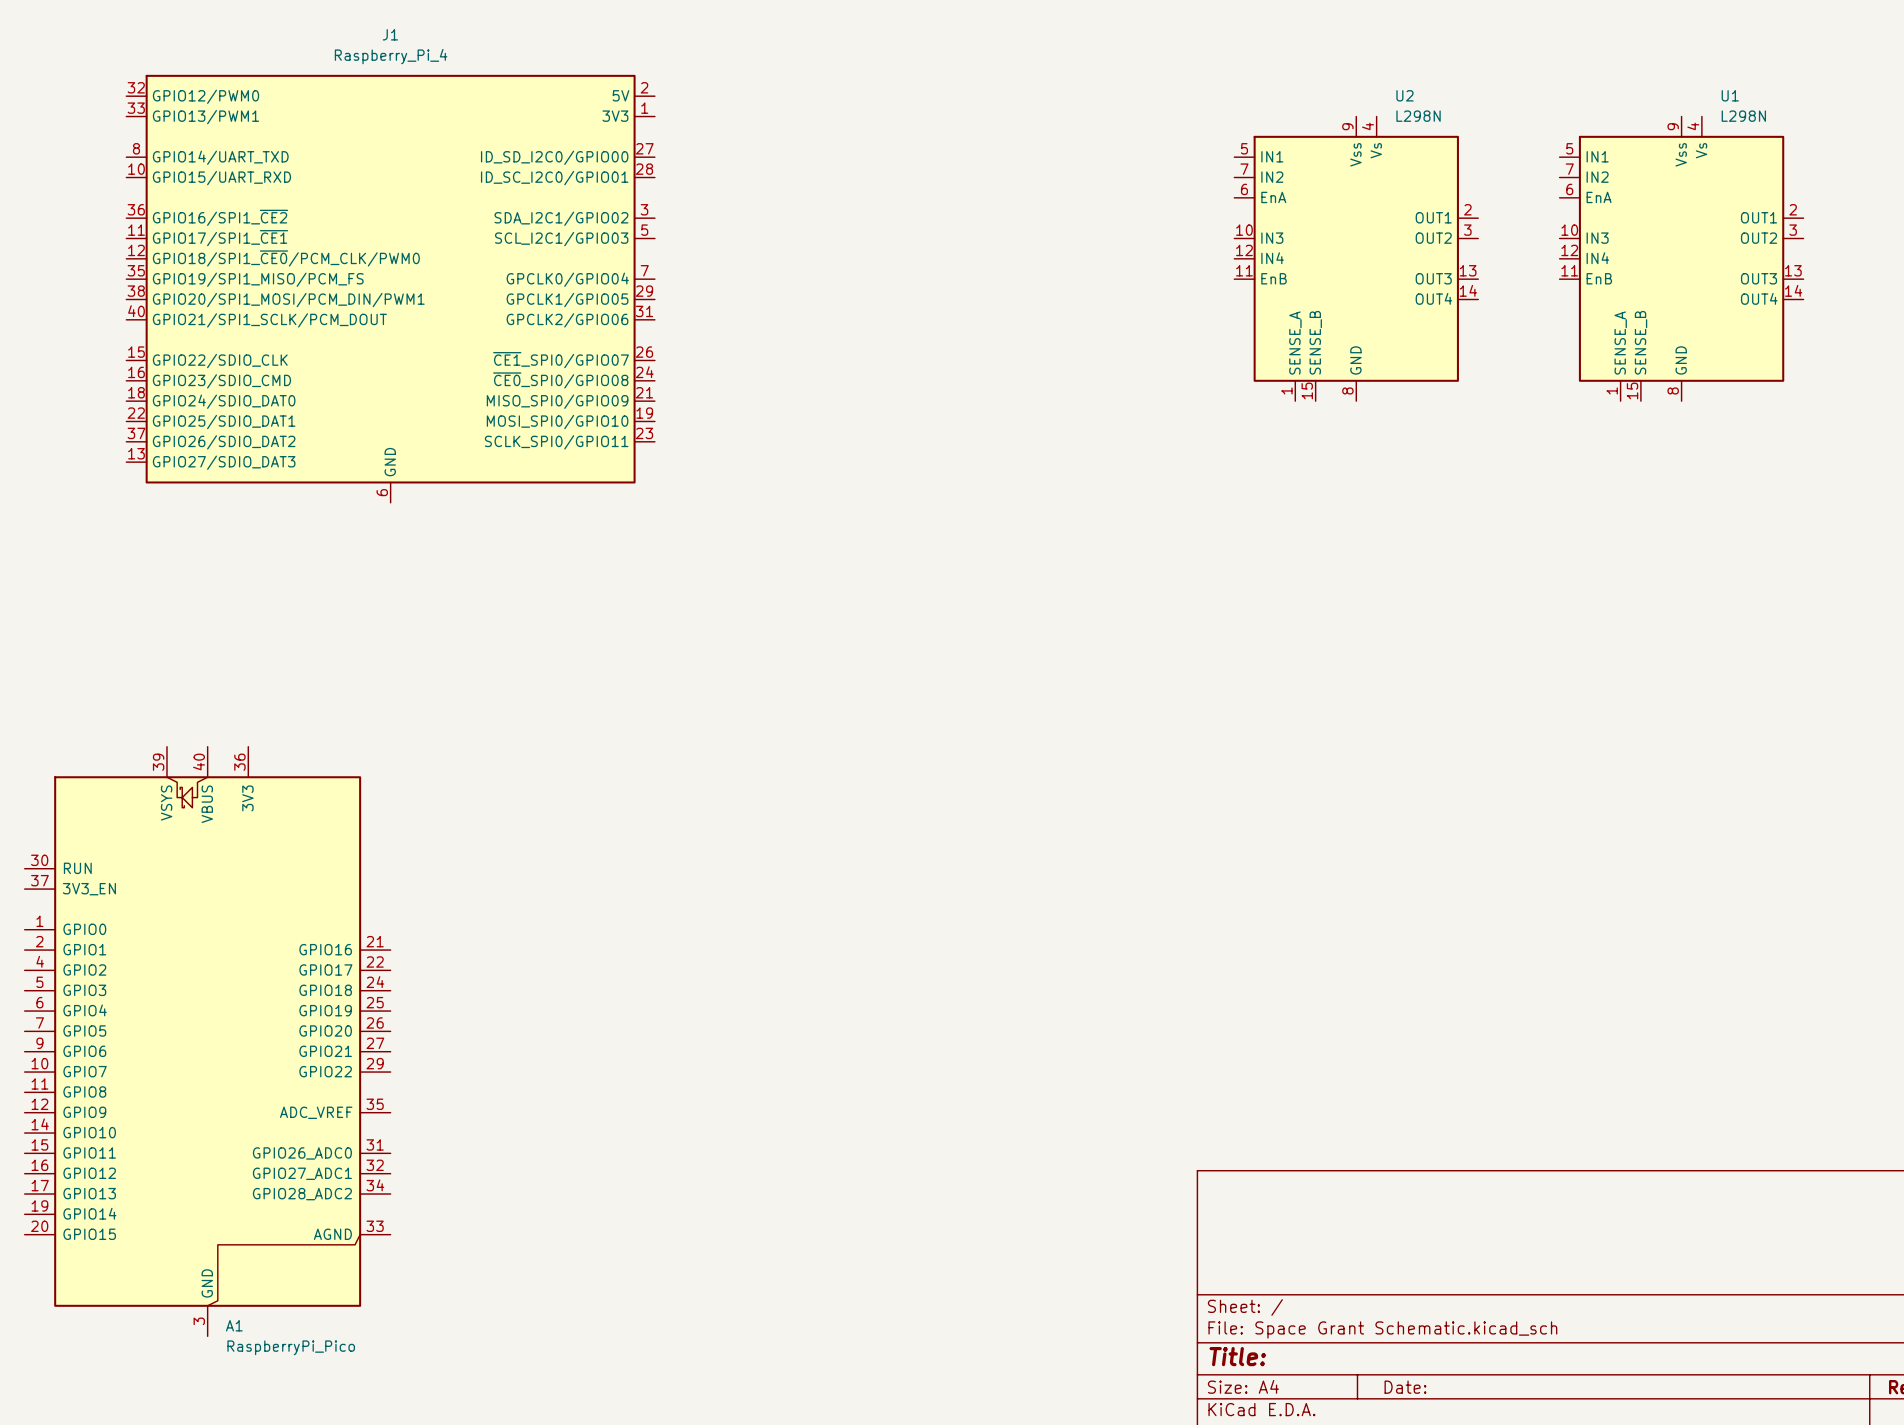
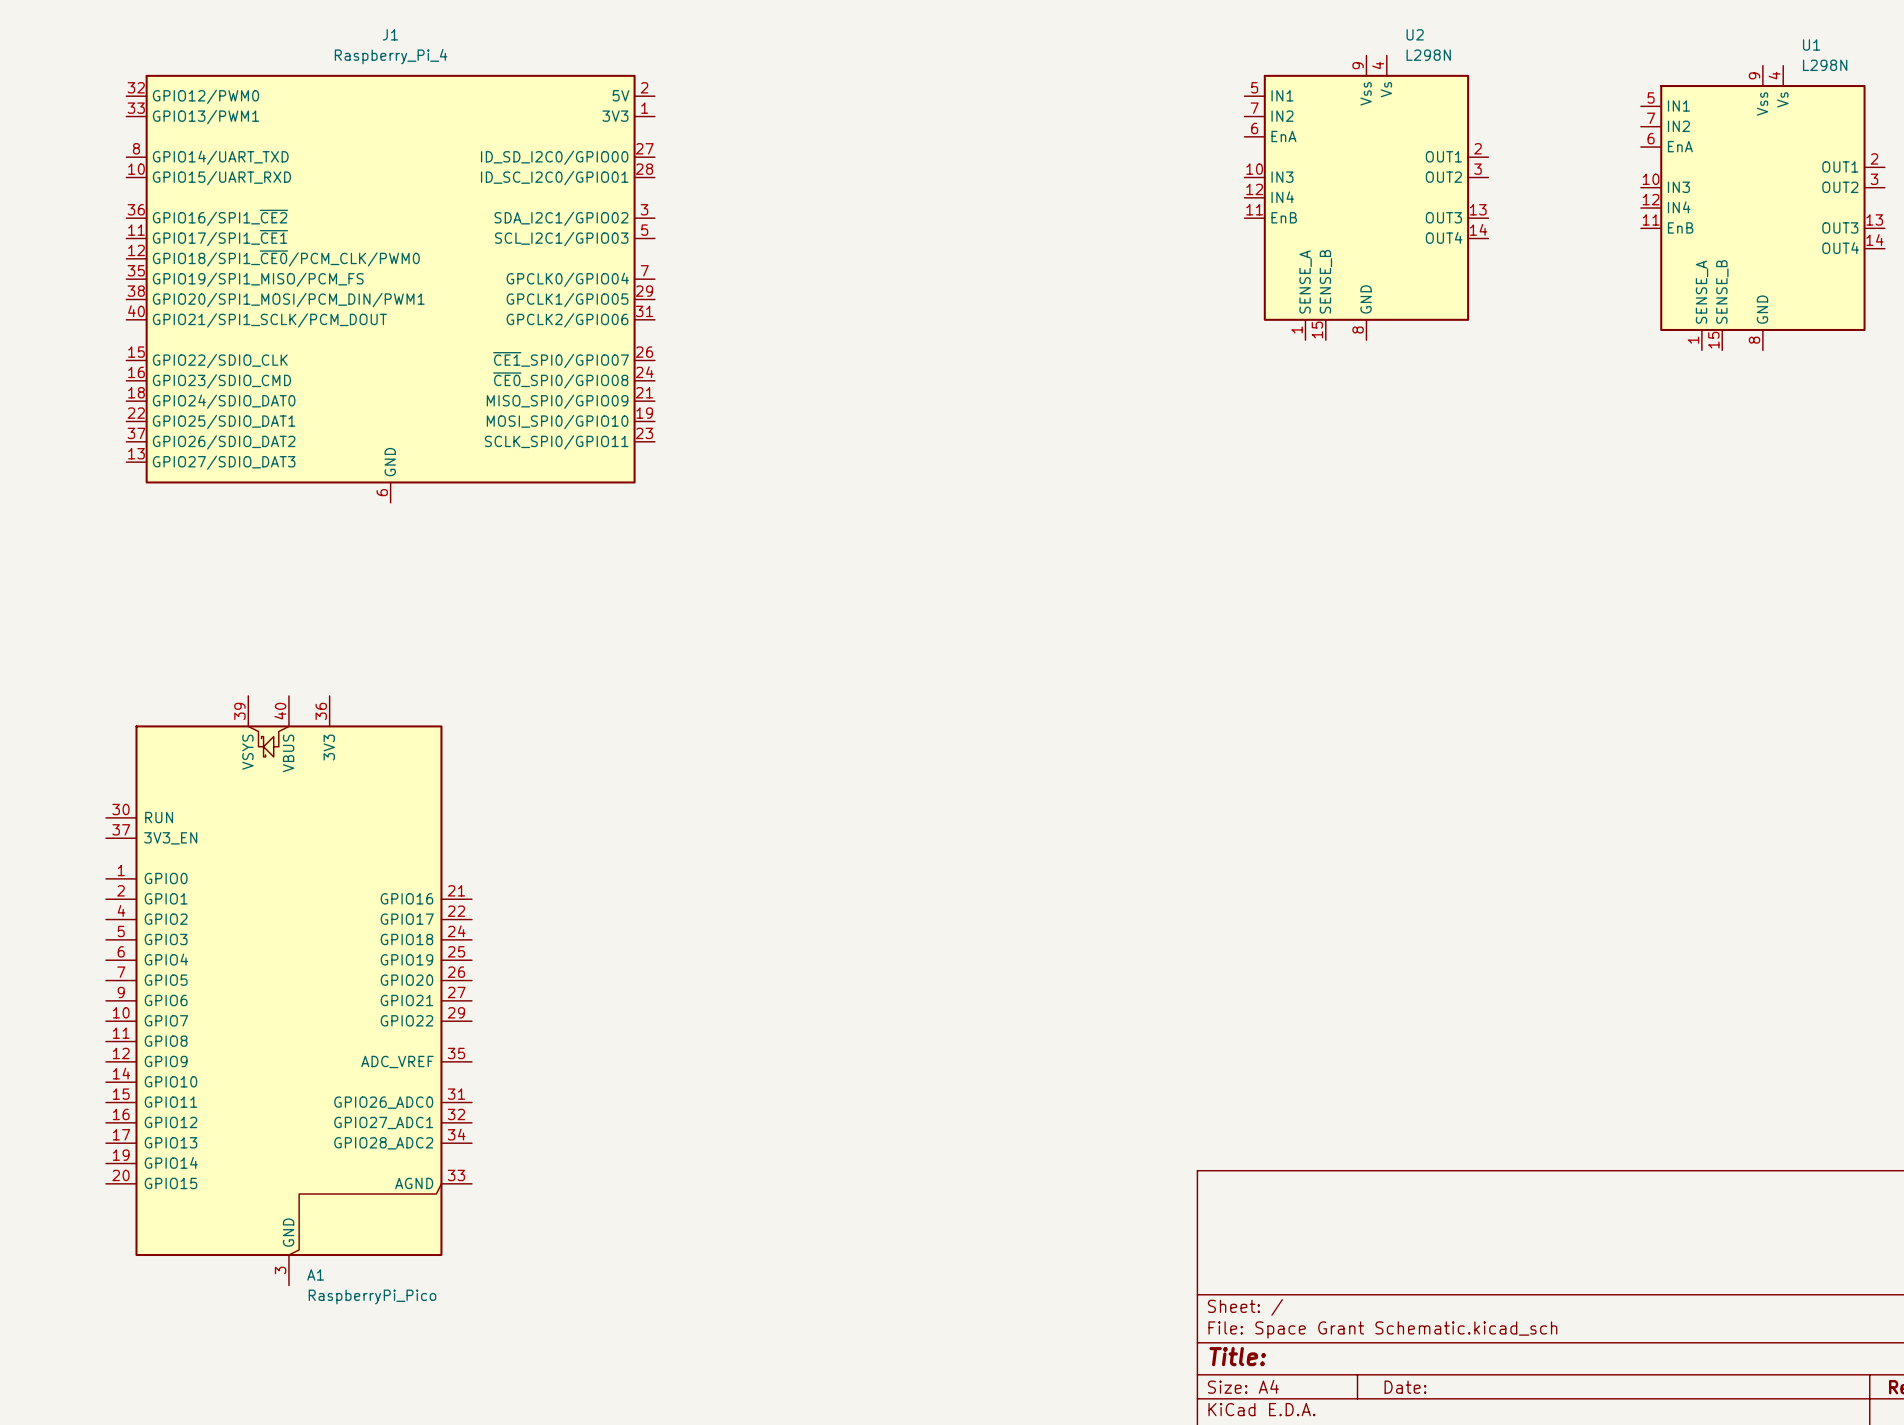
U2 position: (1356, 258) -> (1366, 197)
U1 position: (1681, 258) -> (1762, 208)
A1 position: (207, 1041) -> (288, 990)

